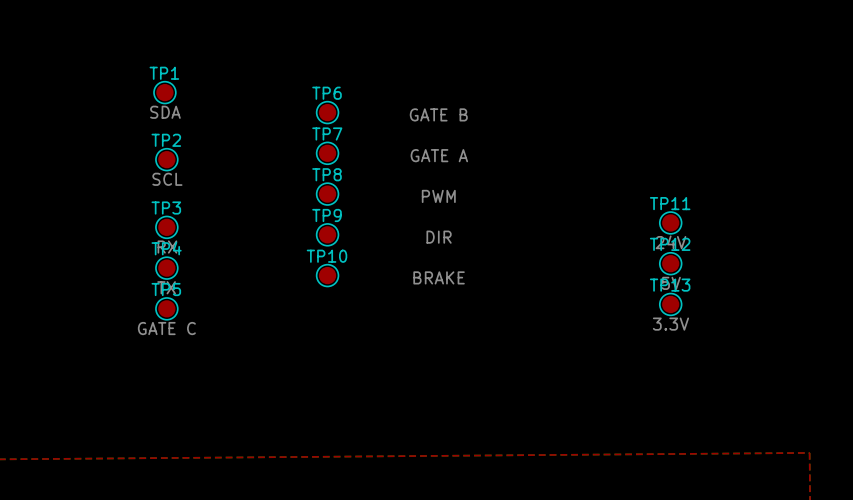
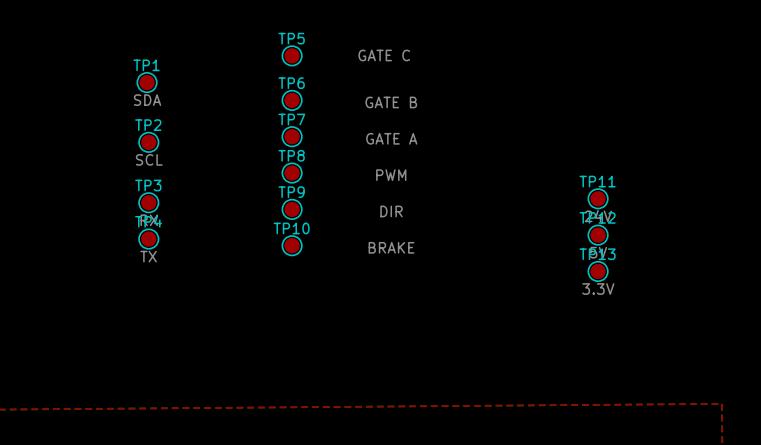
TP5 position: (166, 308) -> (292, 55)
TP5 value position: GATE C (166, 328) -> GATE C (384, 55)

